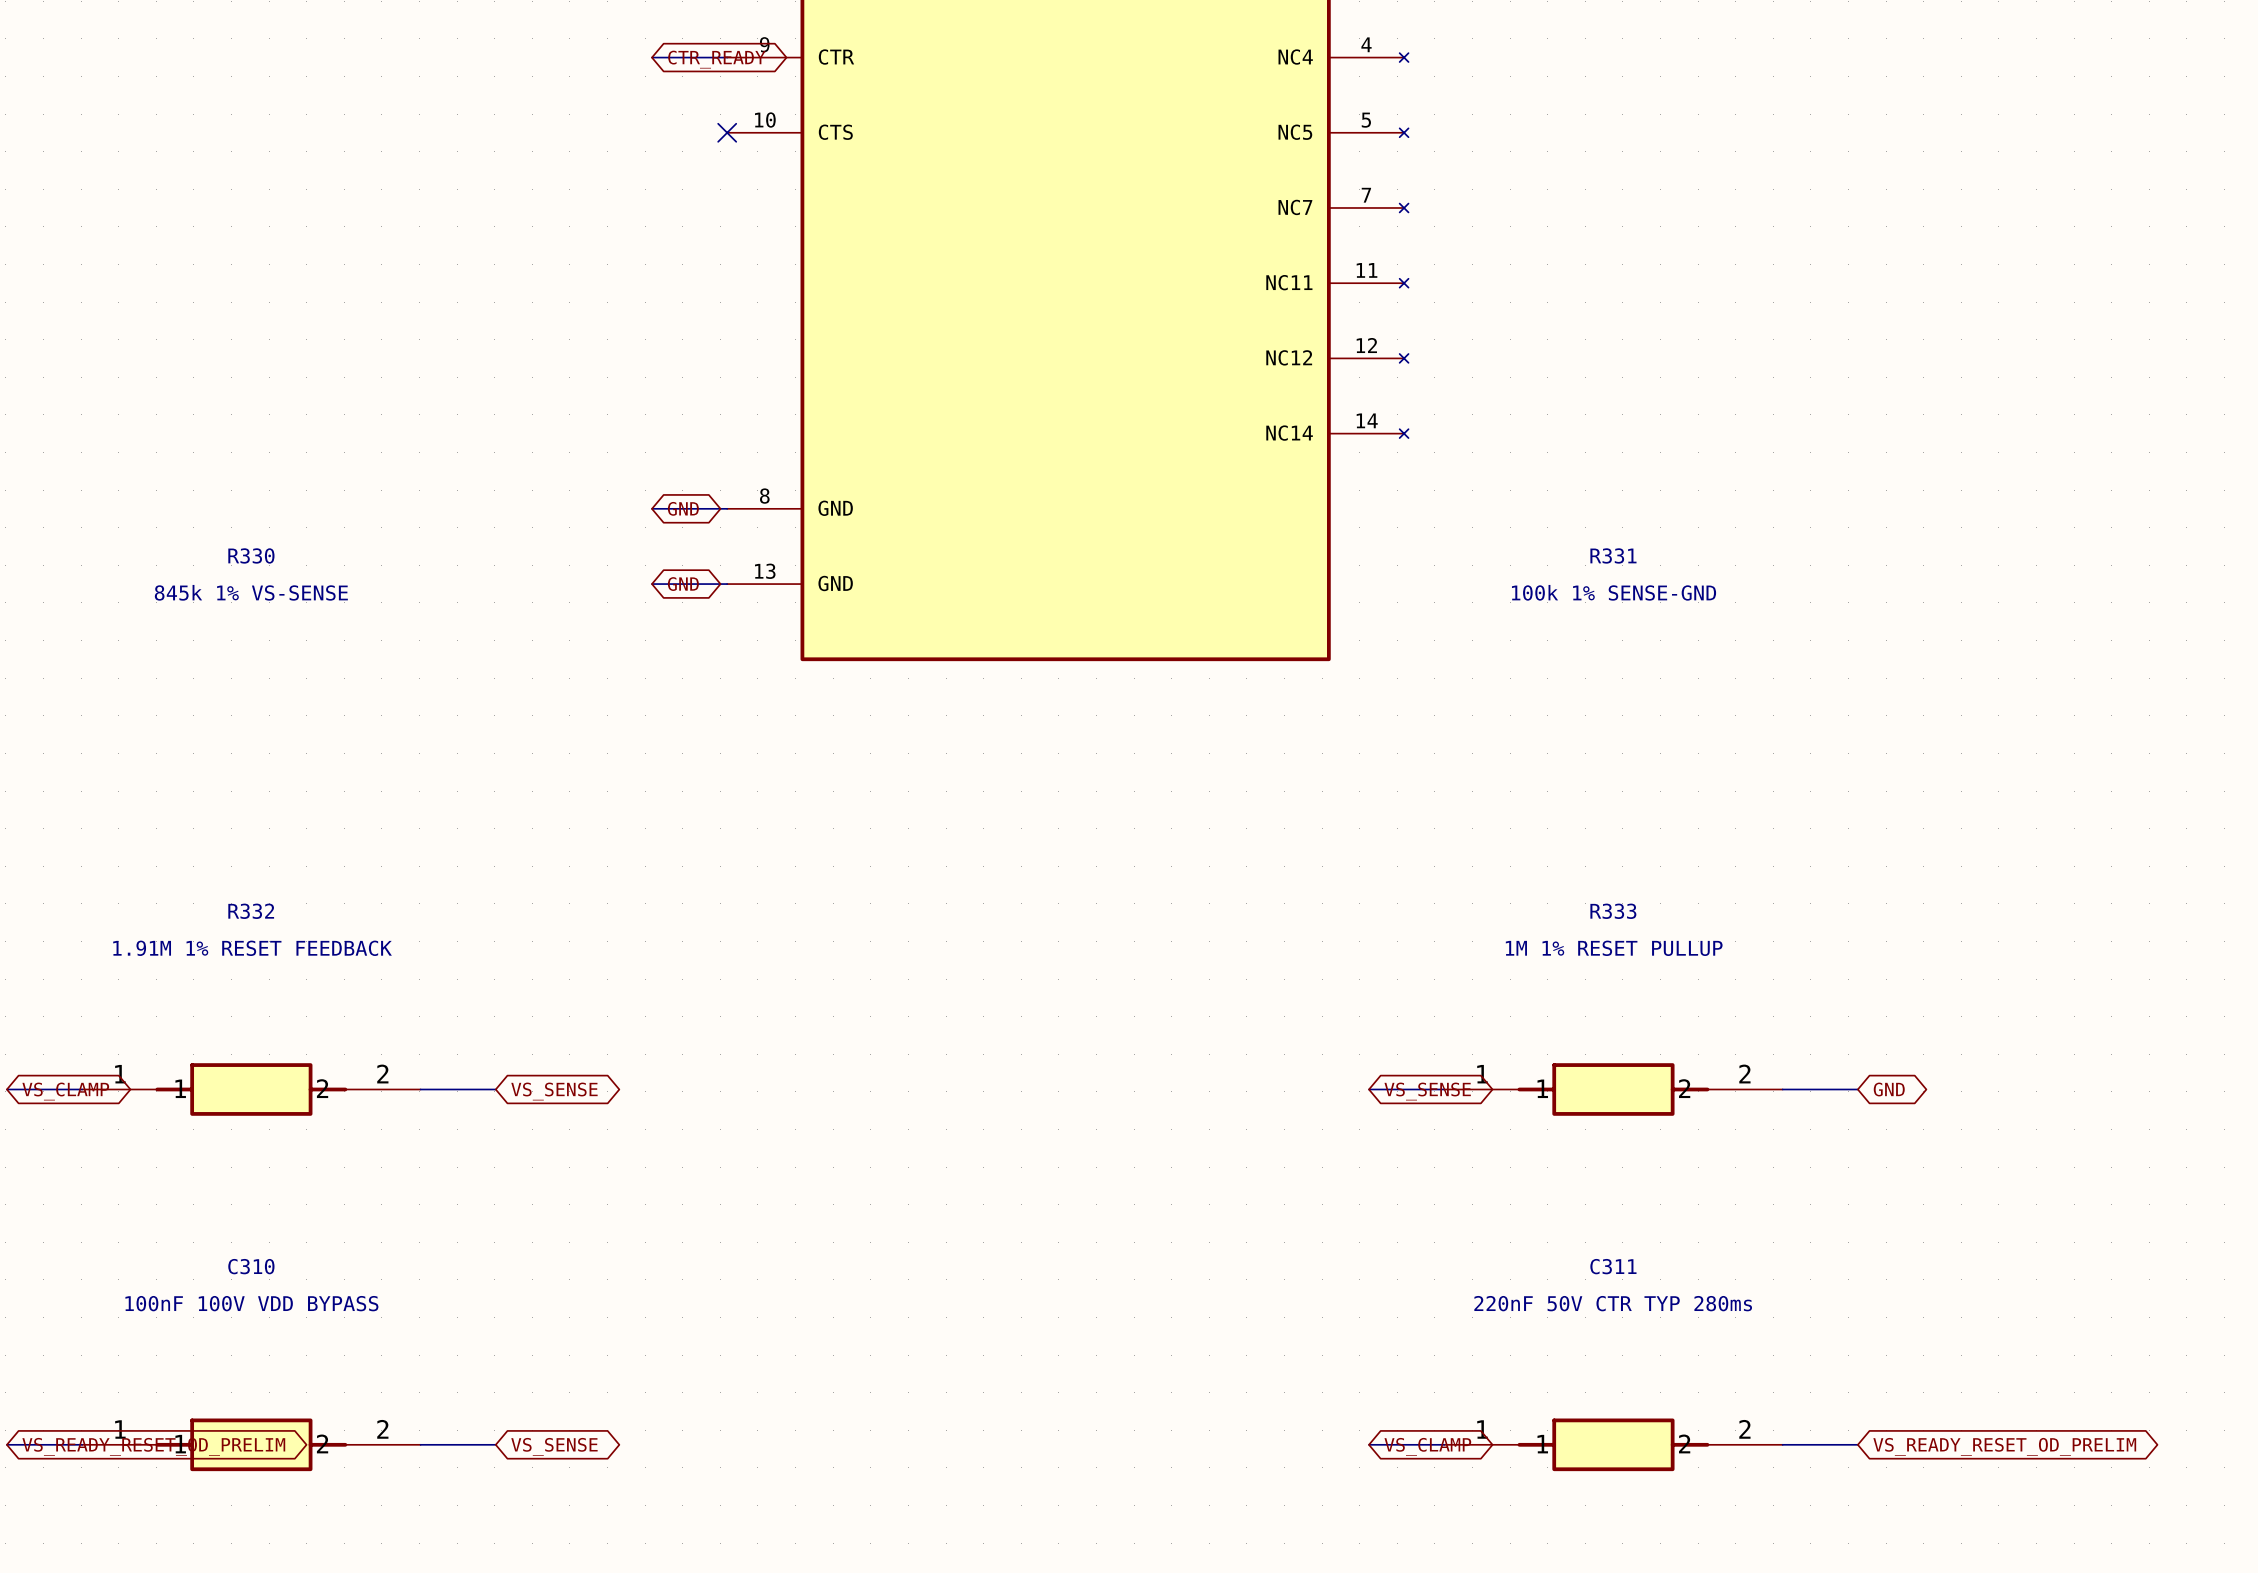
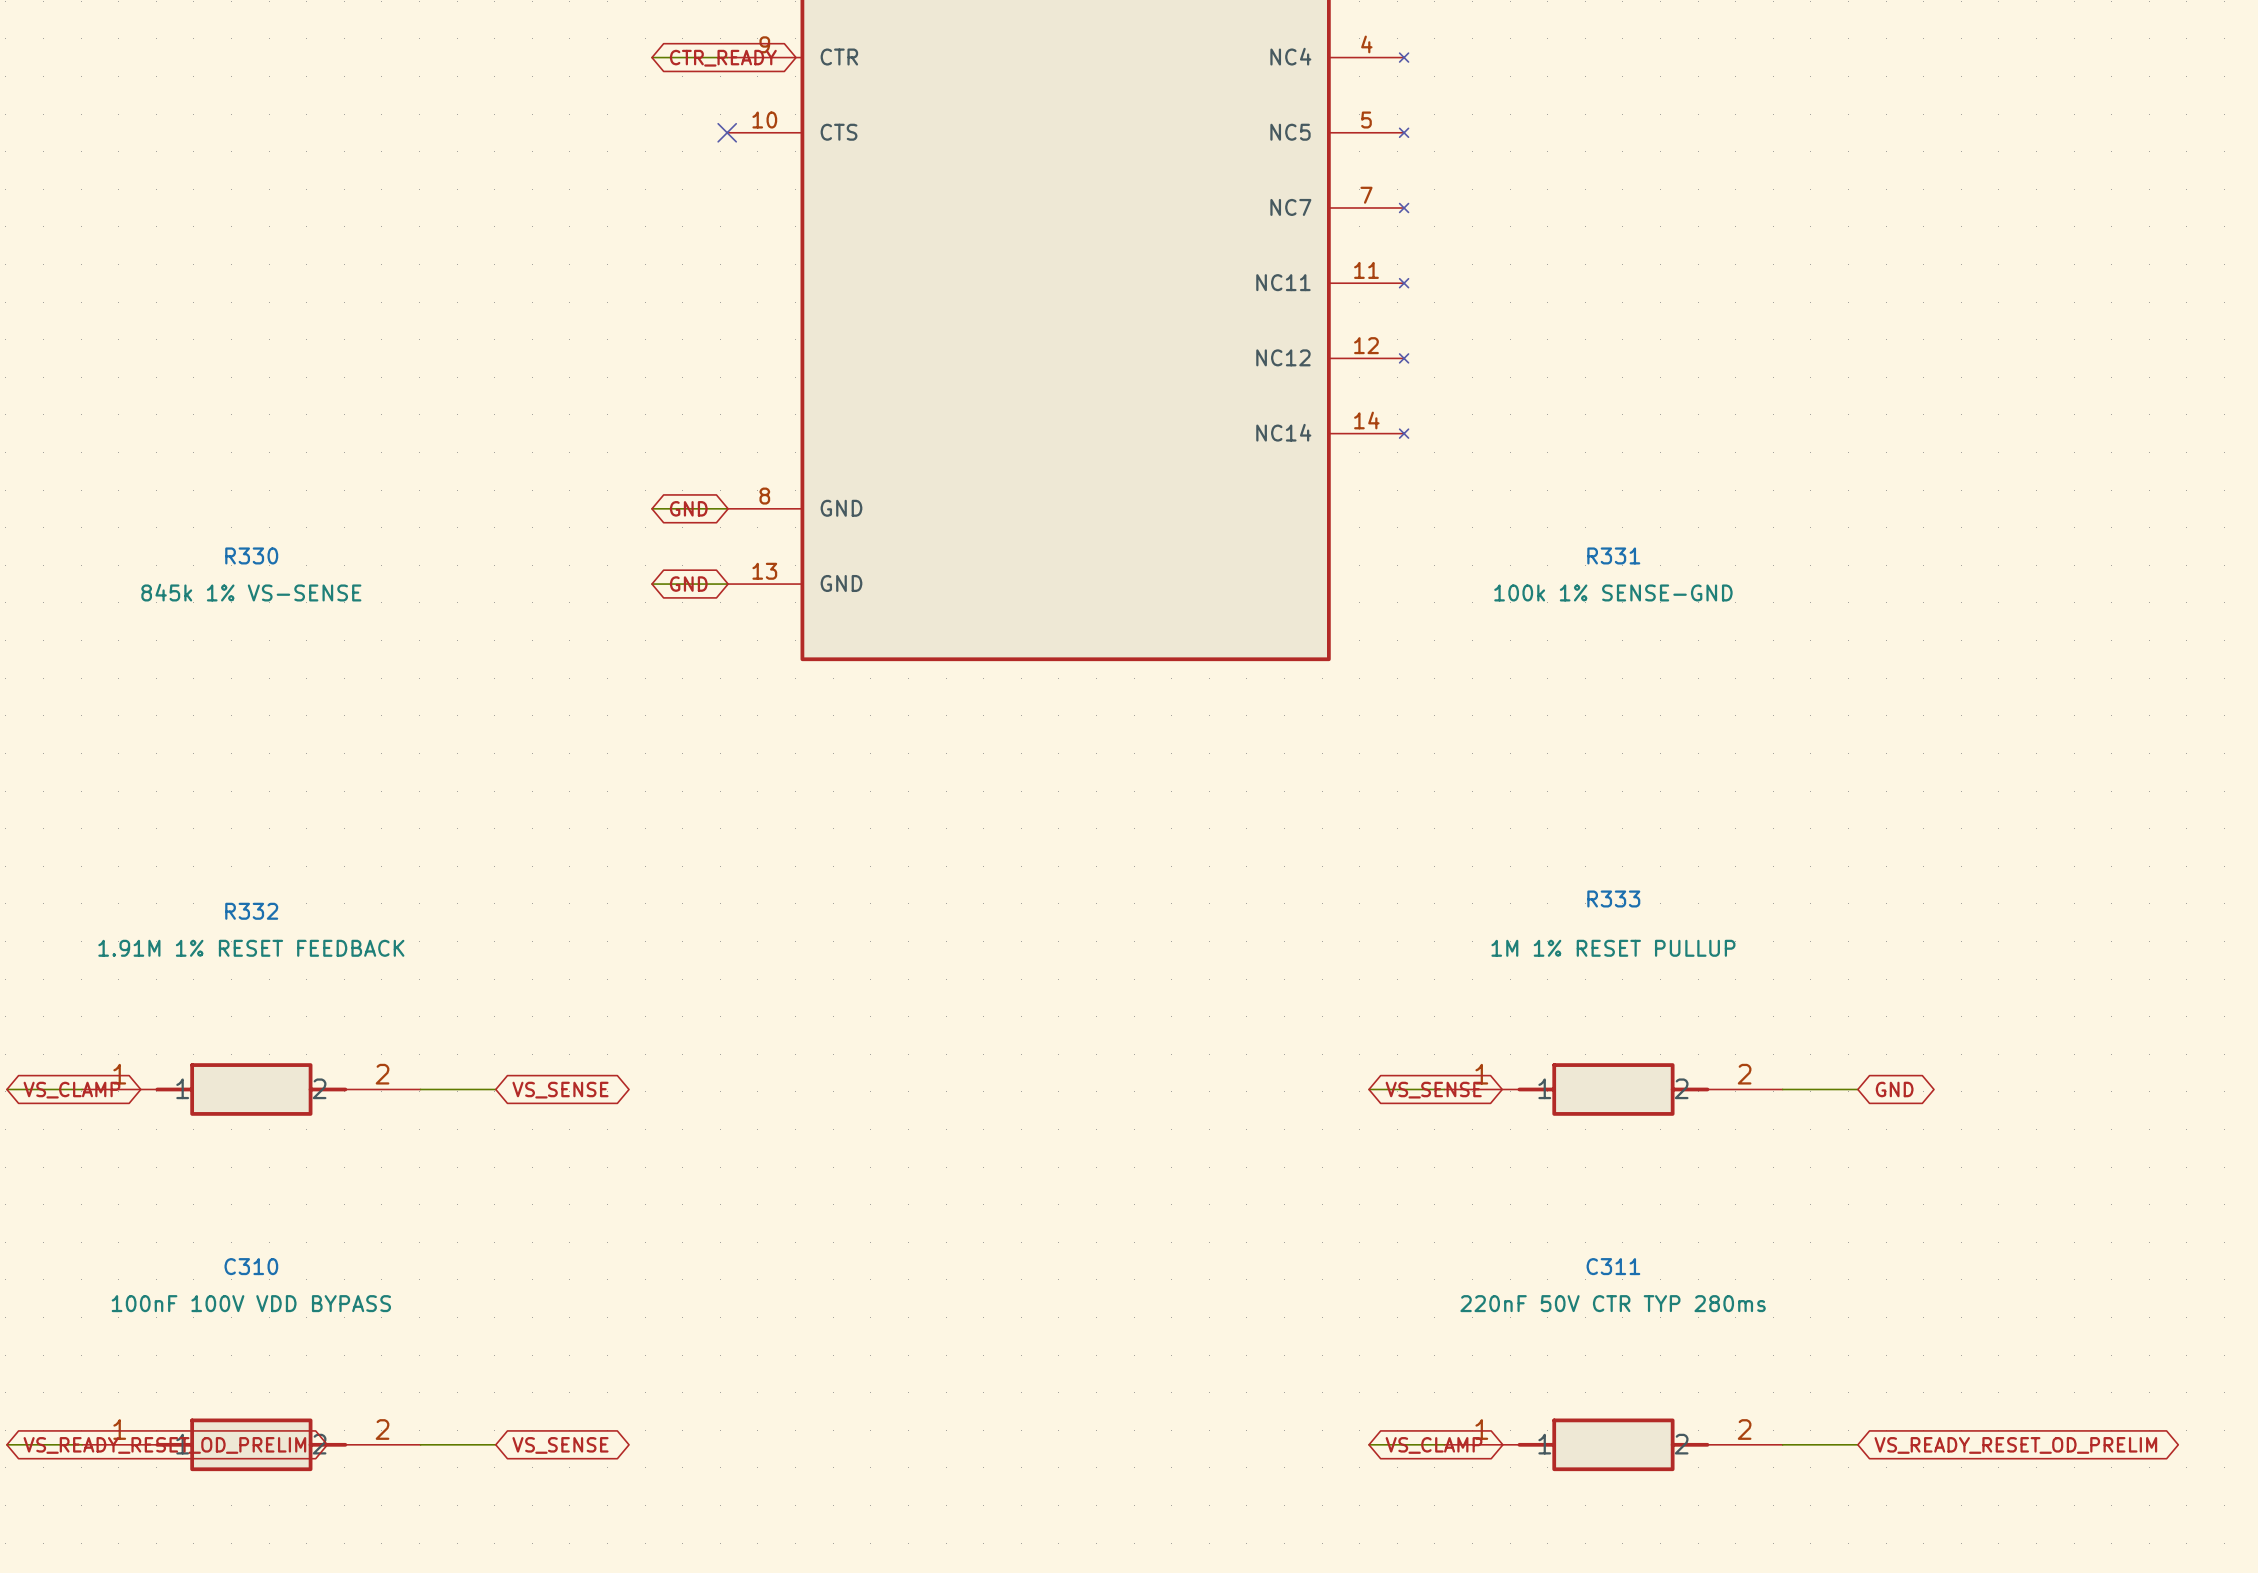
R333 name position: R333 (1613, 911) -> R333 (1613, 898)

